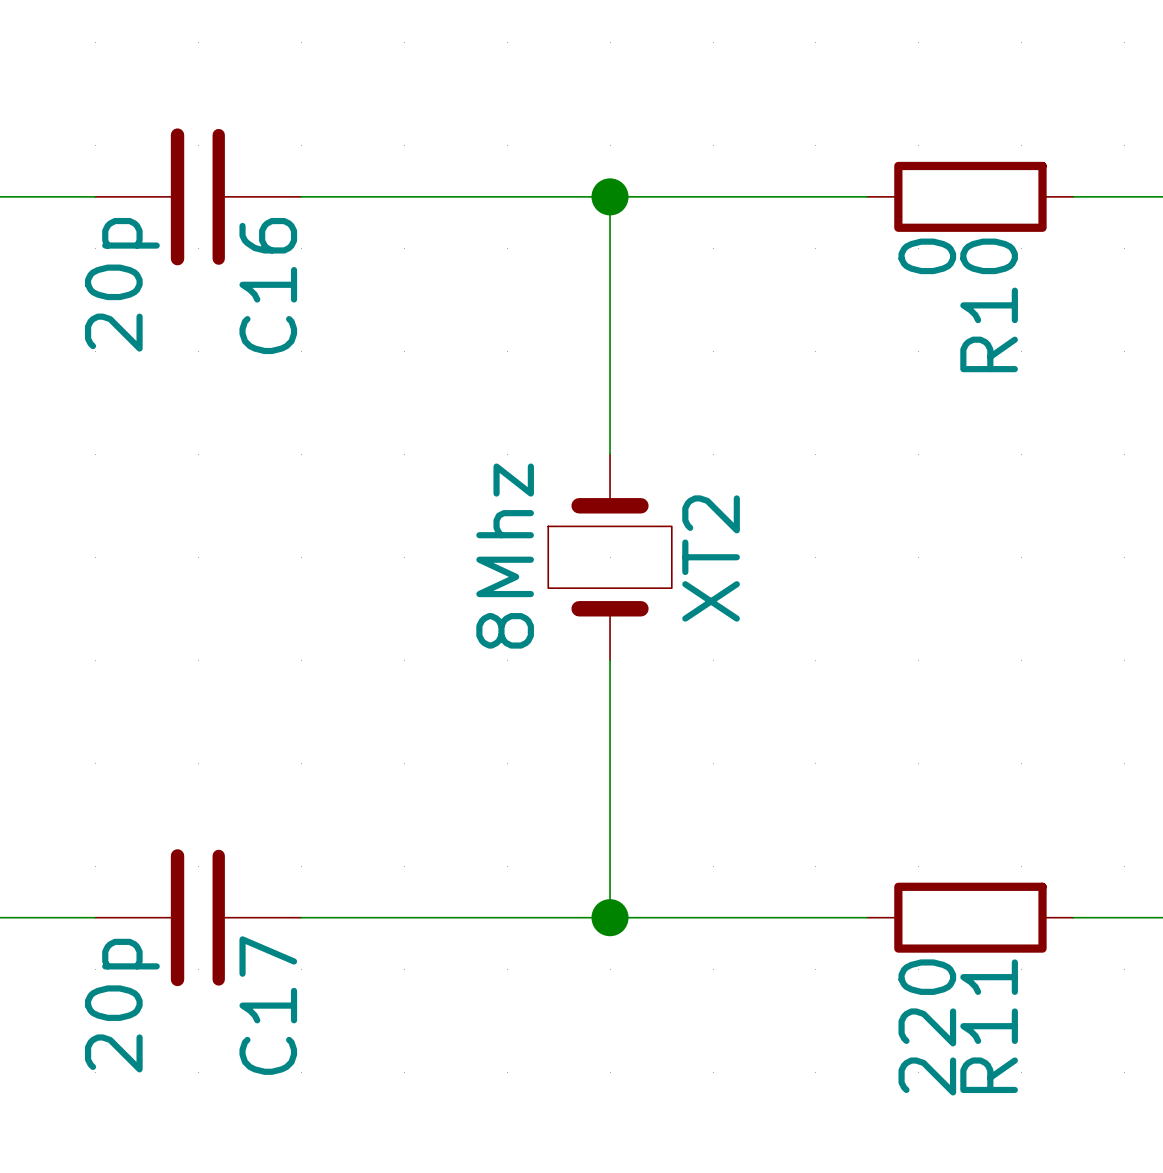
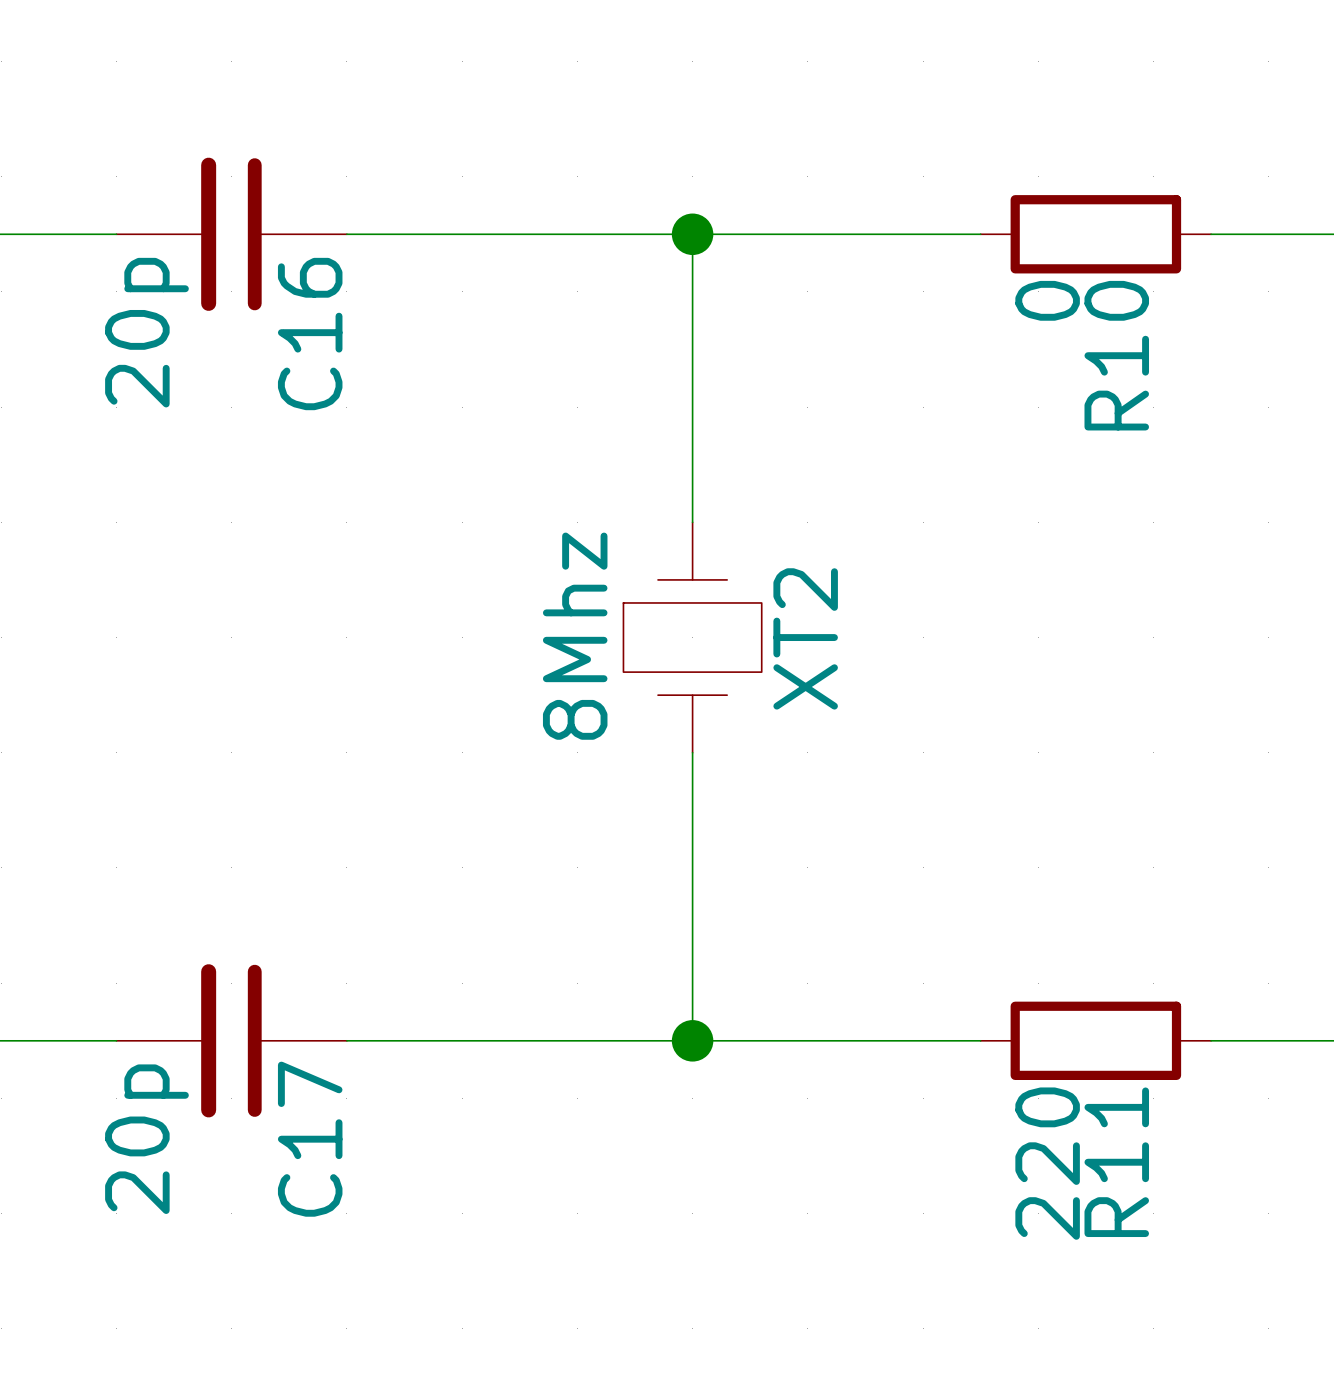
XT2 symbol: [548, 454, 672, 661] -> [623, 522, 762, 753]

